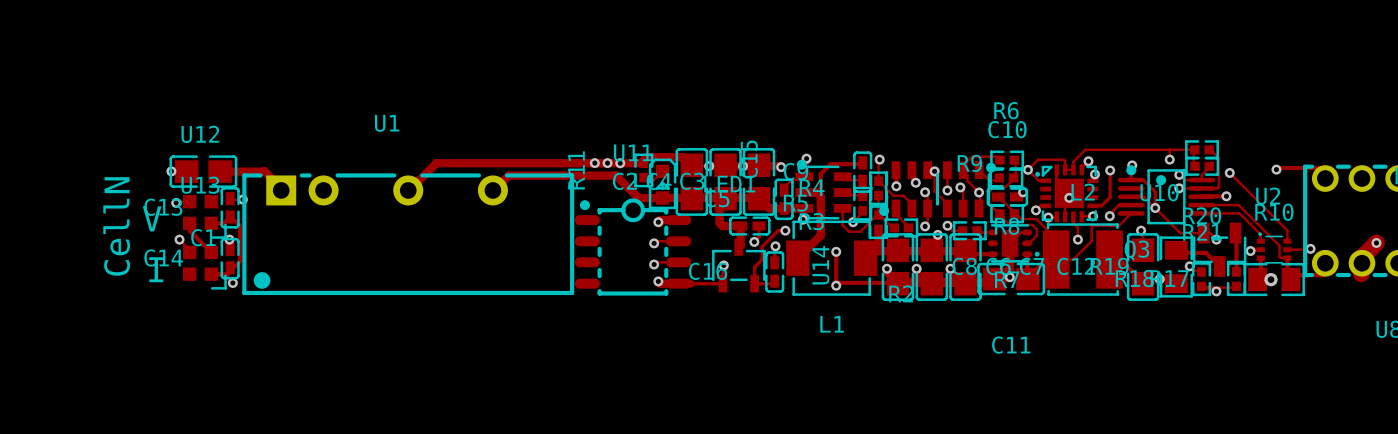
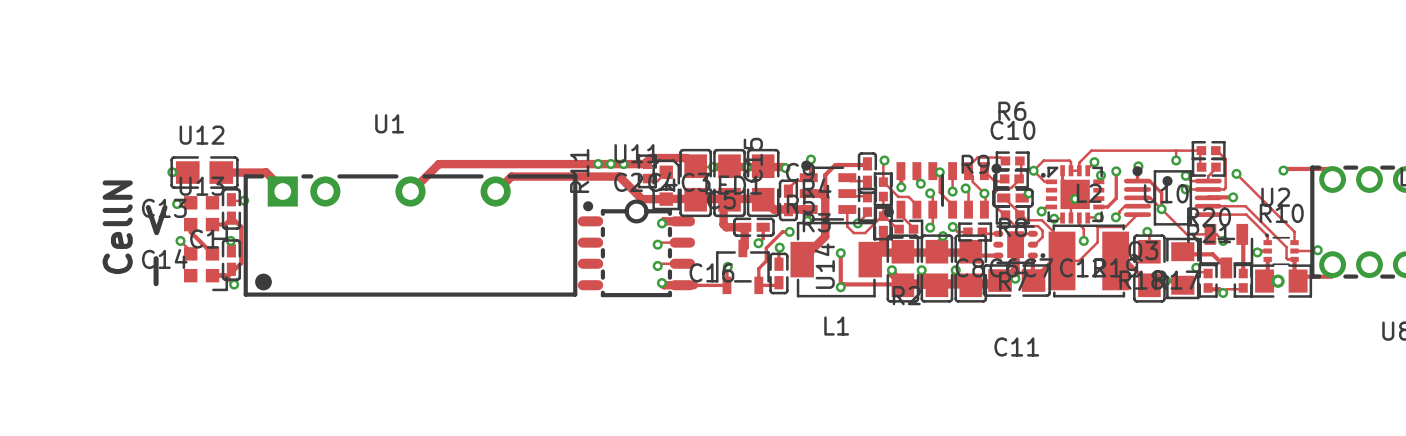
track: (1376, 242) (1361, 258) (1361, 273) -> none
via: (1376, 242) -> none

